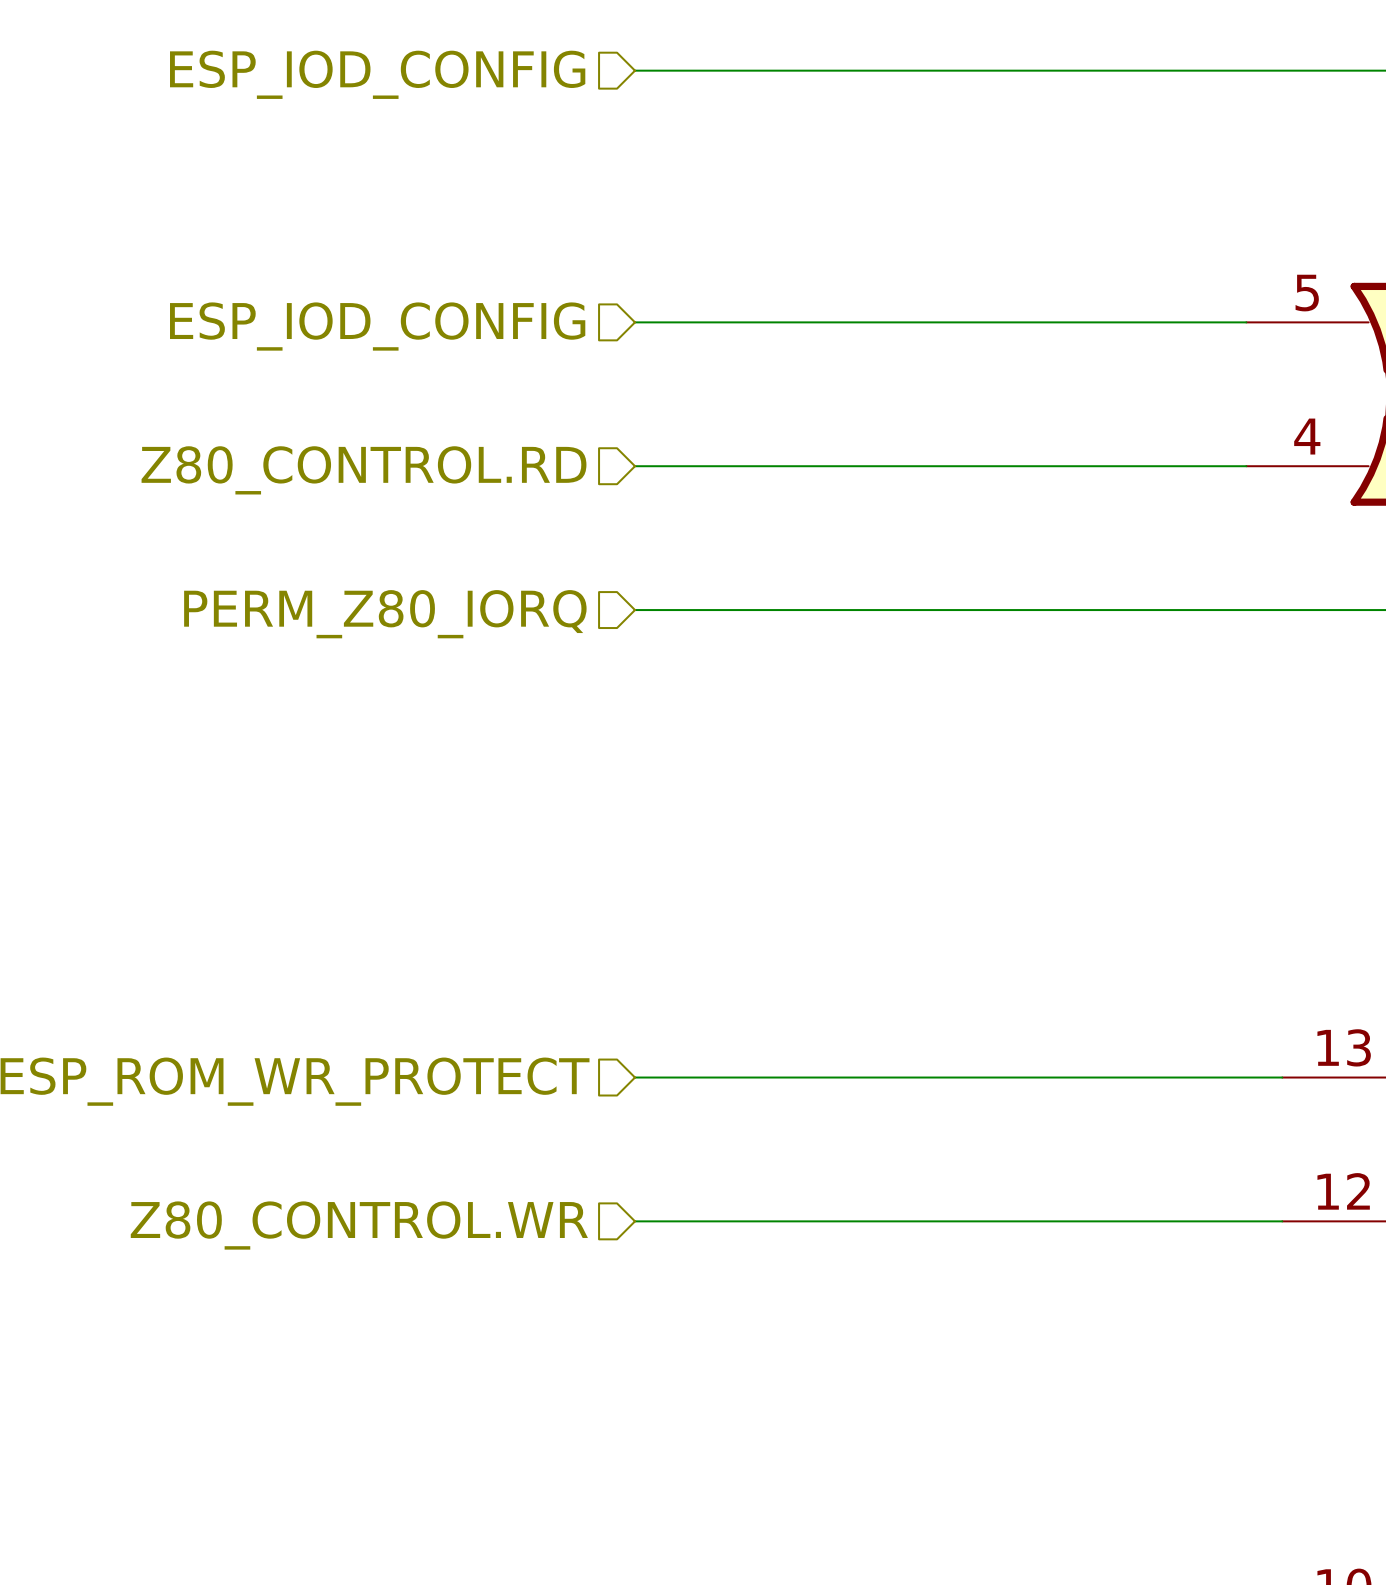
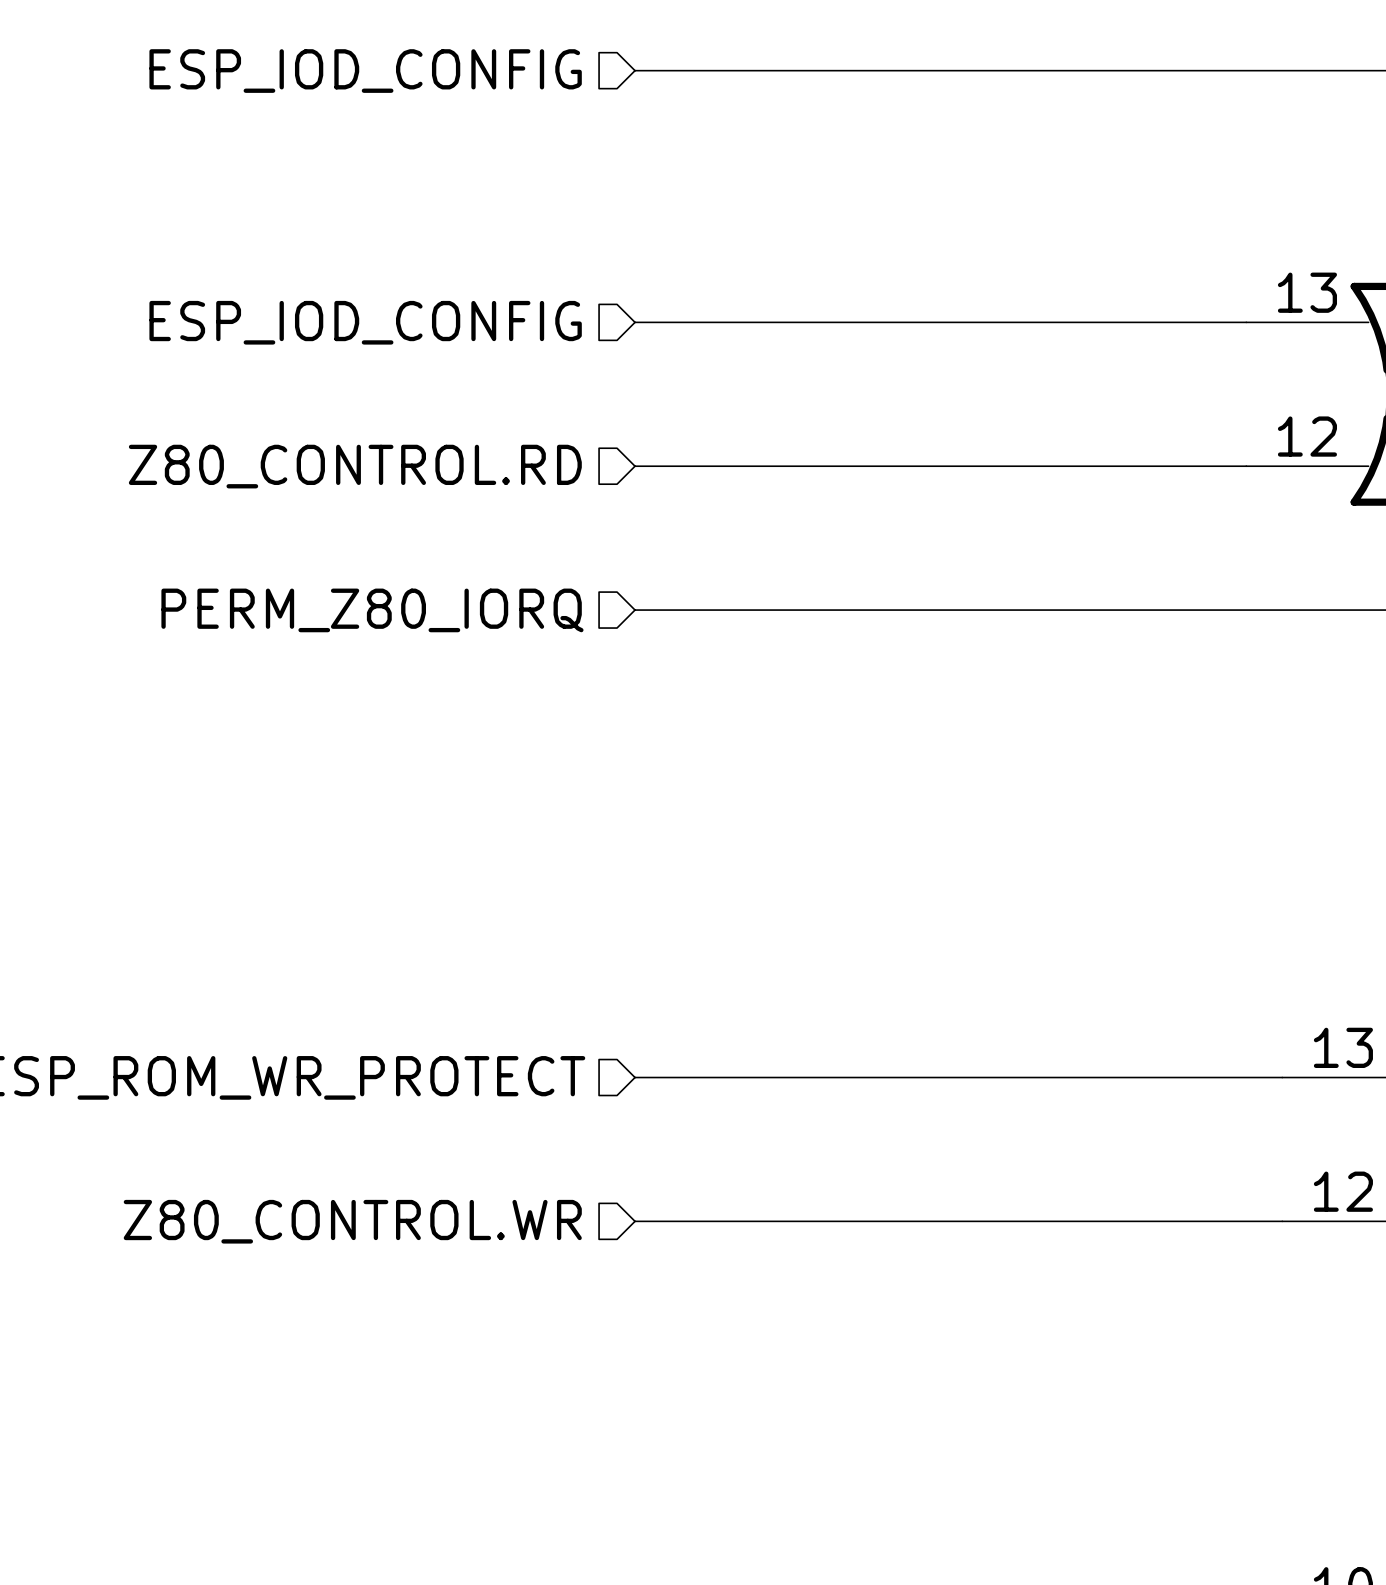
part pin number: 5 (1307, 293) -> 13 (1307, 292)
part pin number: 4 (1307, 436) -> 12 (1307, 436)

